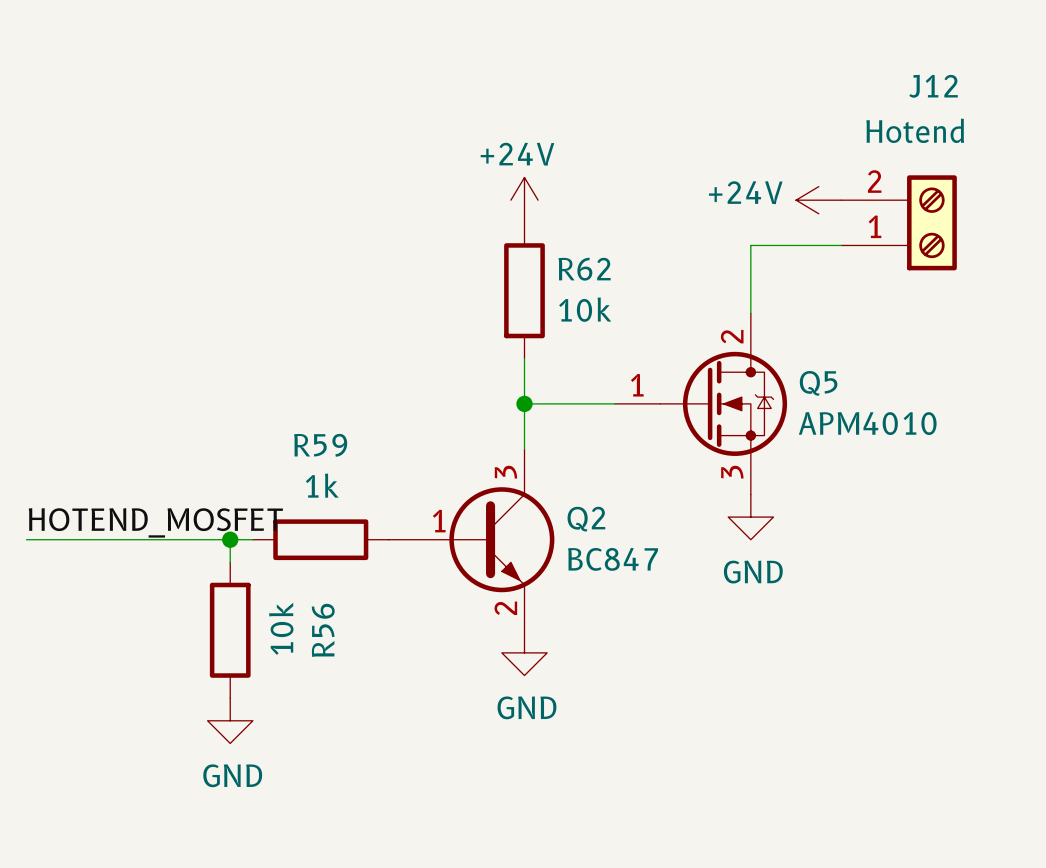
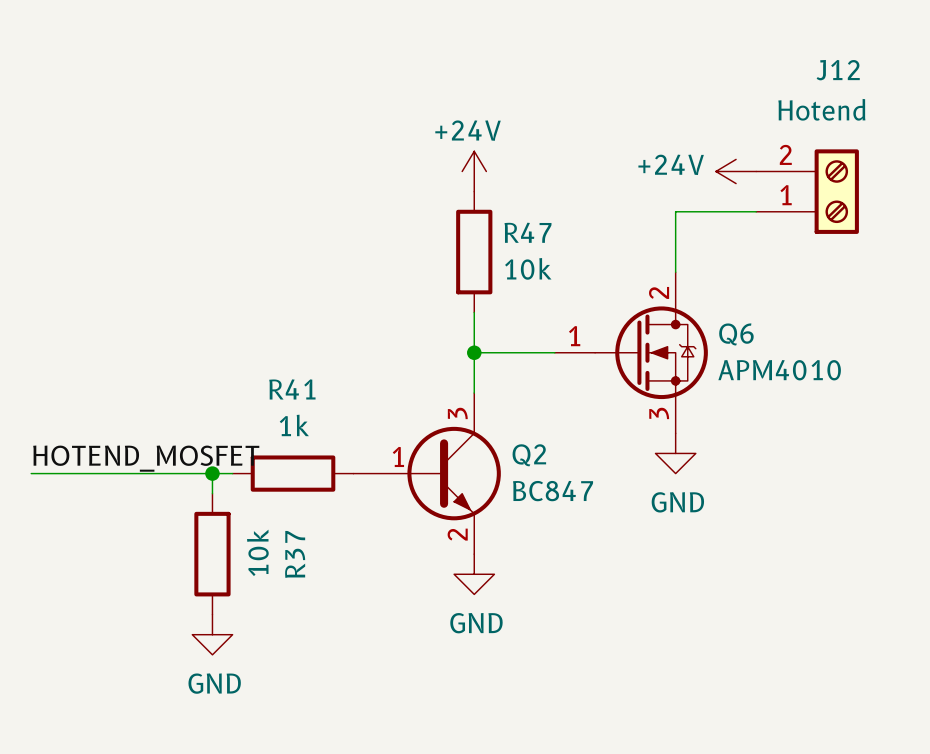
R62 name: R62 (584, 269) -> R47 (528, 232)
Q5 name: Q5 (818, 383) -> Q6 (736, 334)
R59 name: R59 (320, 445) -> R41 (292, 389)
R56 name: R56 (323, 630) -> R37 (295, 554)

